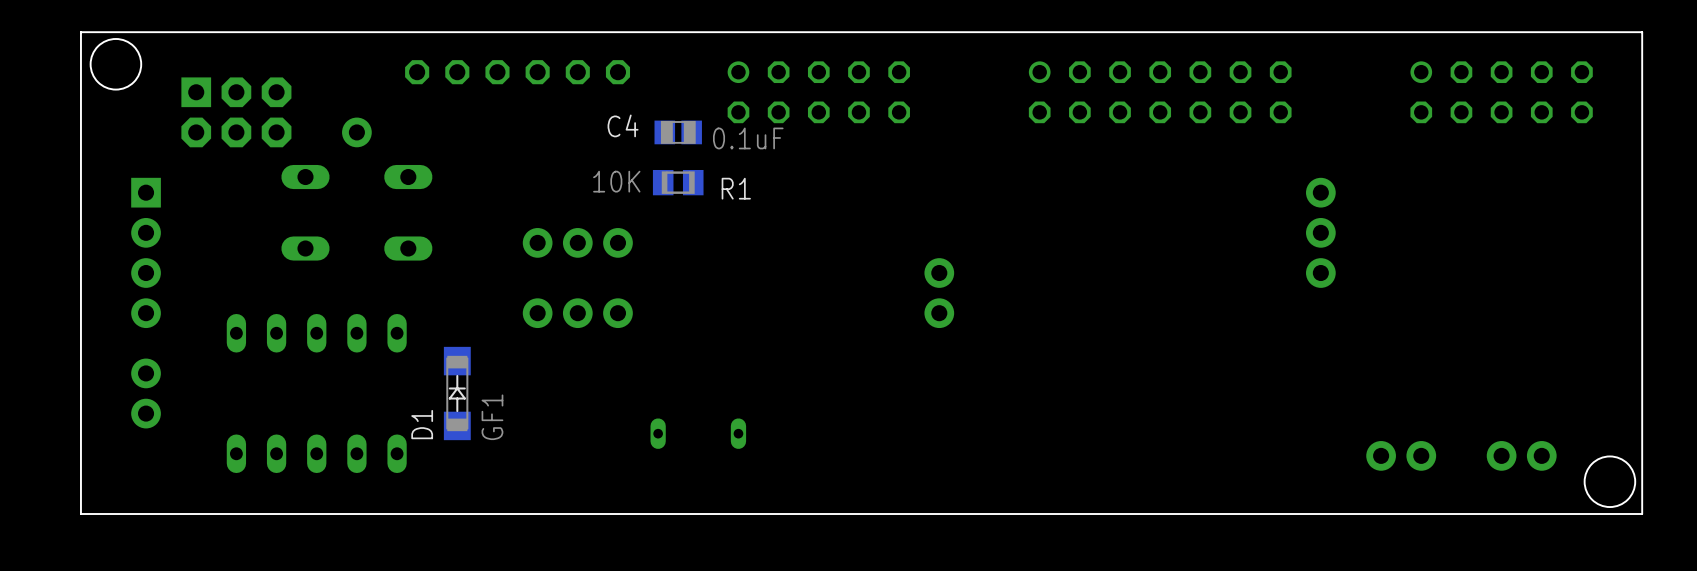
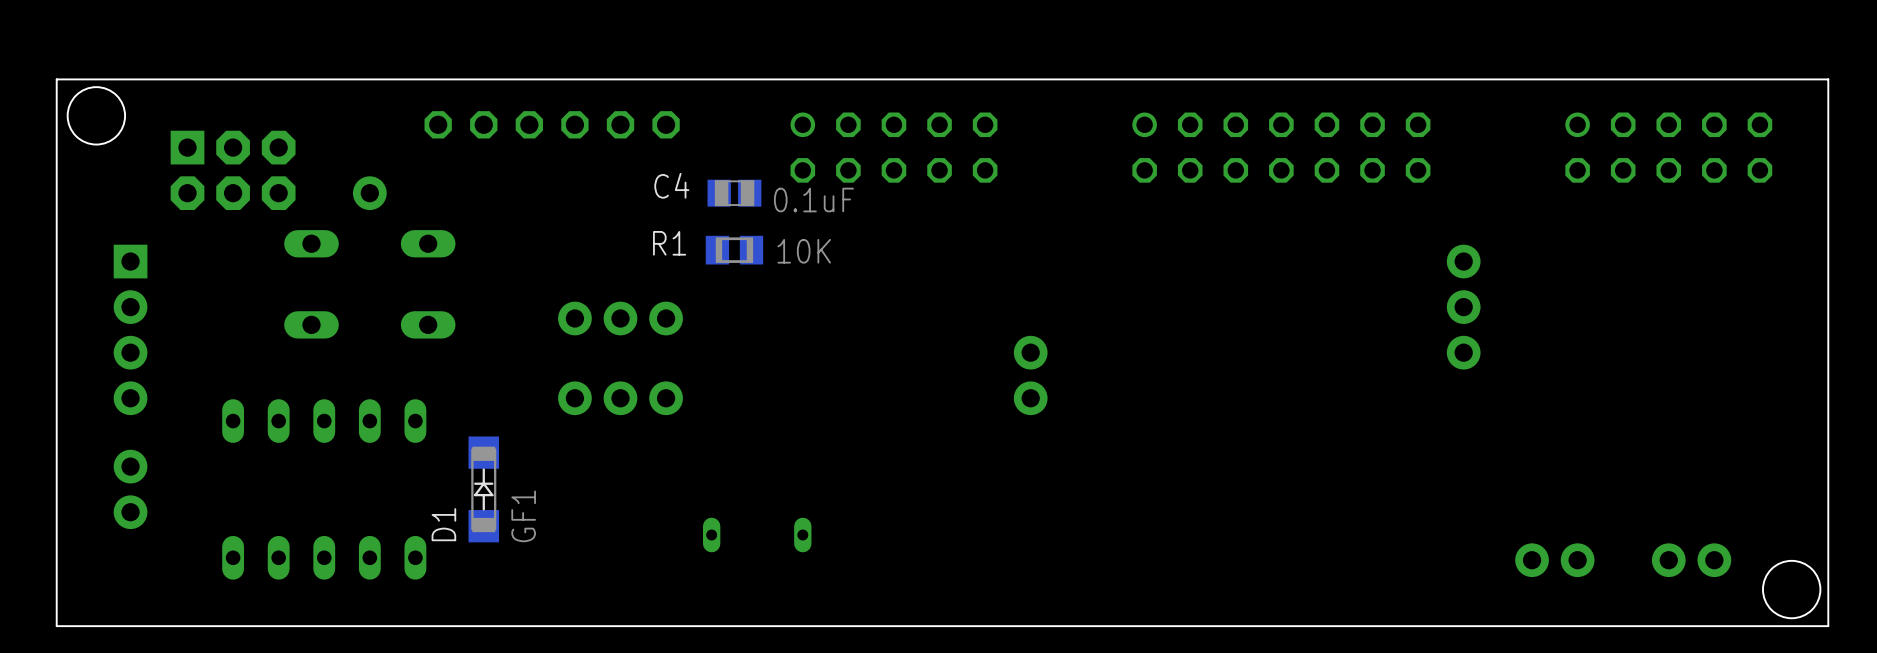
R1 value position: 10K (616, 181) -> 10K (804, 251)
R1 name position: R1 (736, 188) -> R1 (669, 243)

